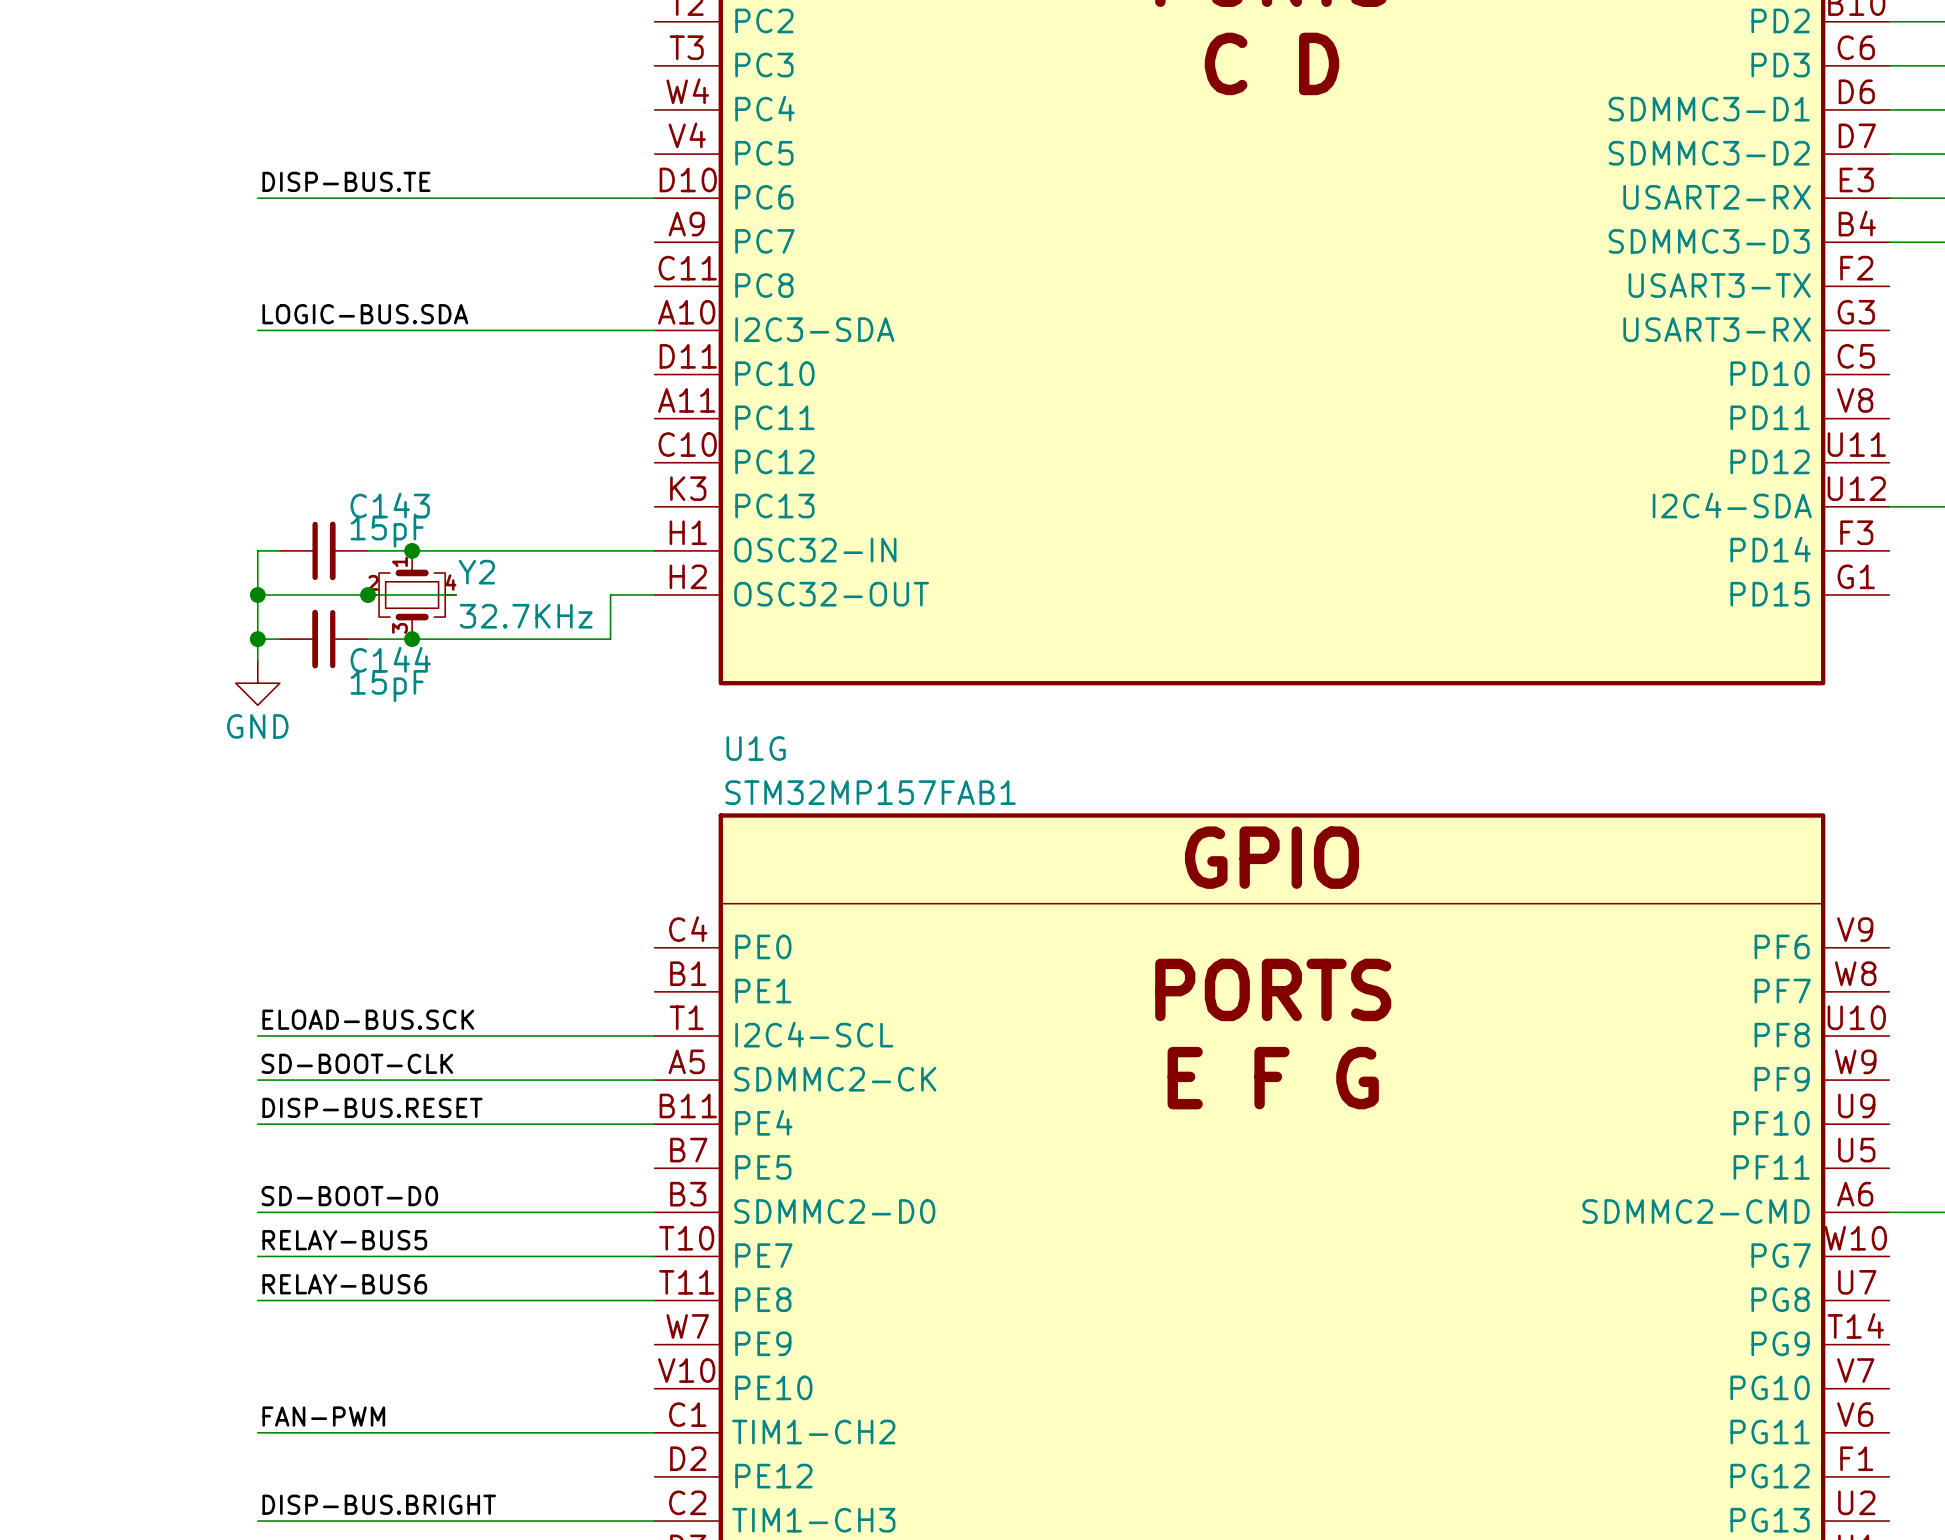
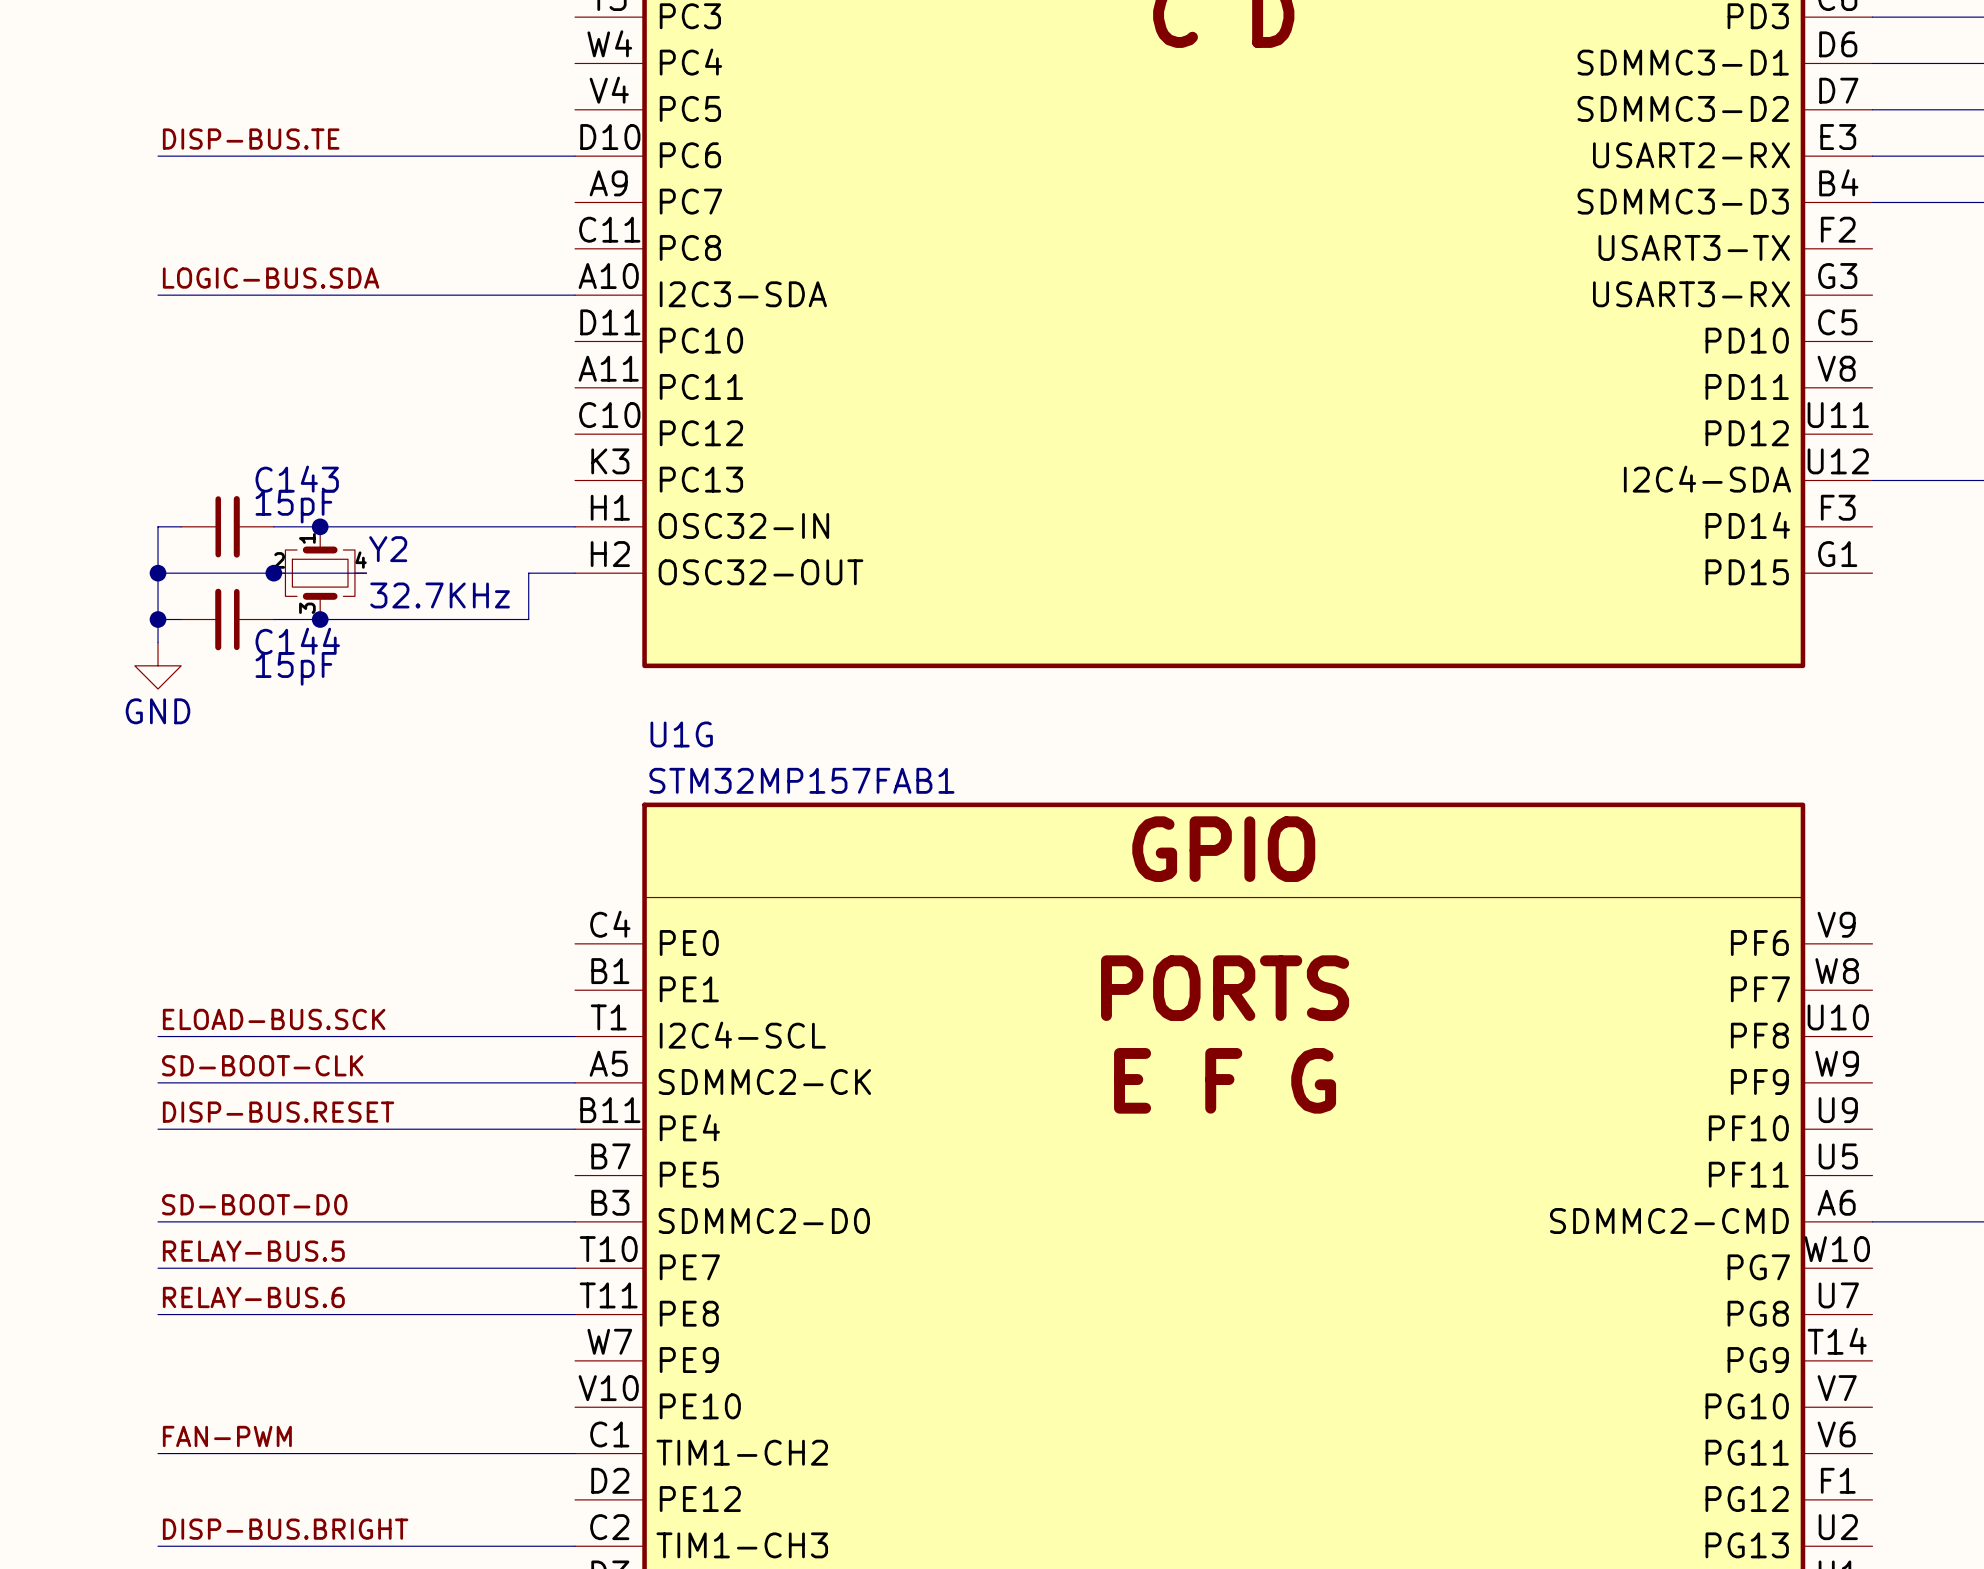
label: RELAY-BUS5 (344, 1240) -> RELAY-BUS.5 (253, 1251)
label: RELAY-BUS6 (344, 1284) -> RELAY-BUS.6 (253, 1297)

